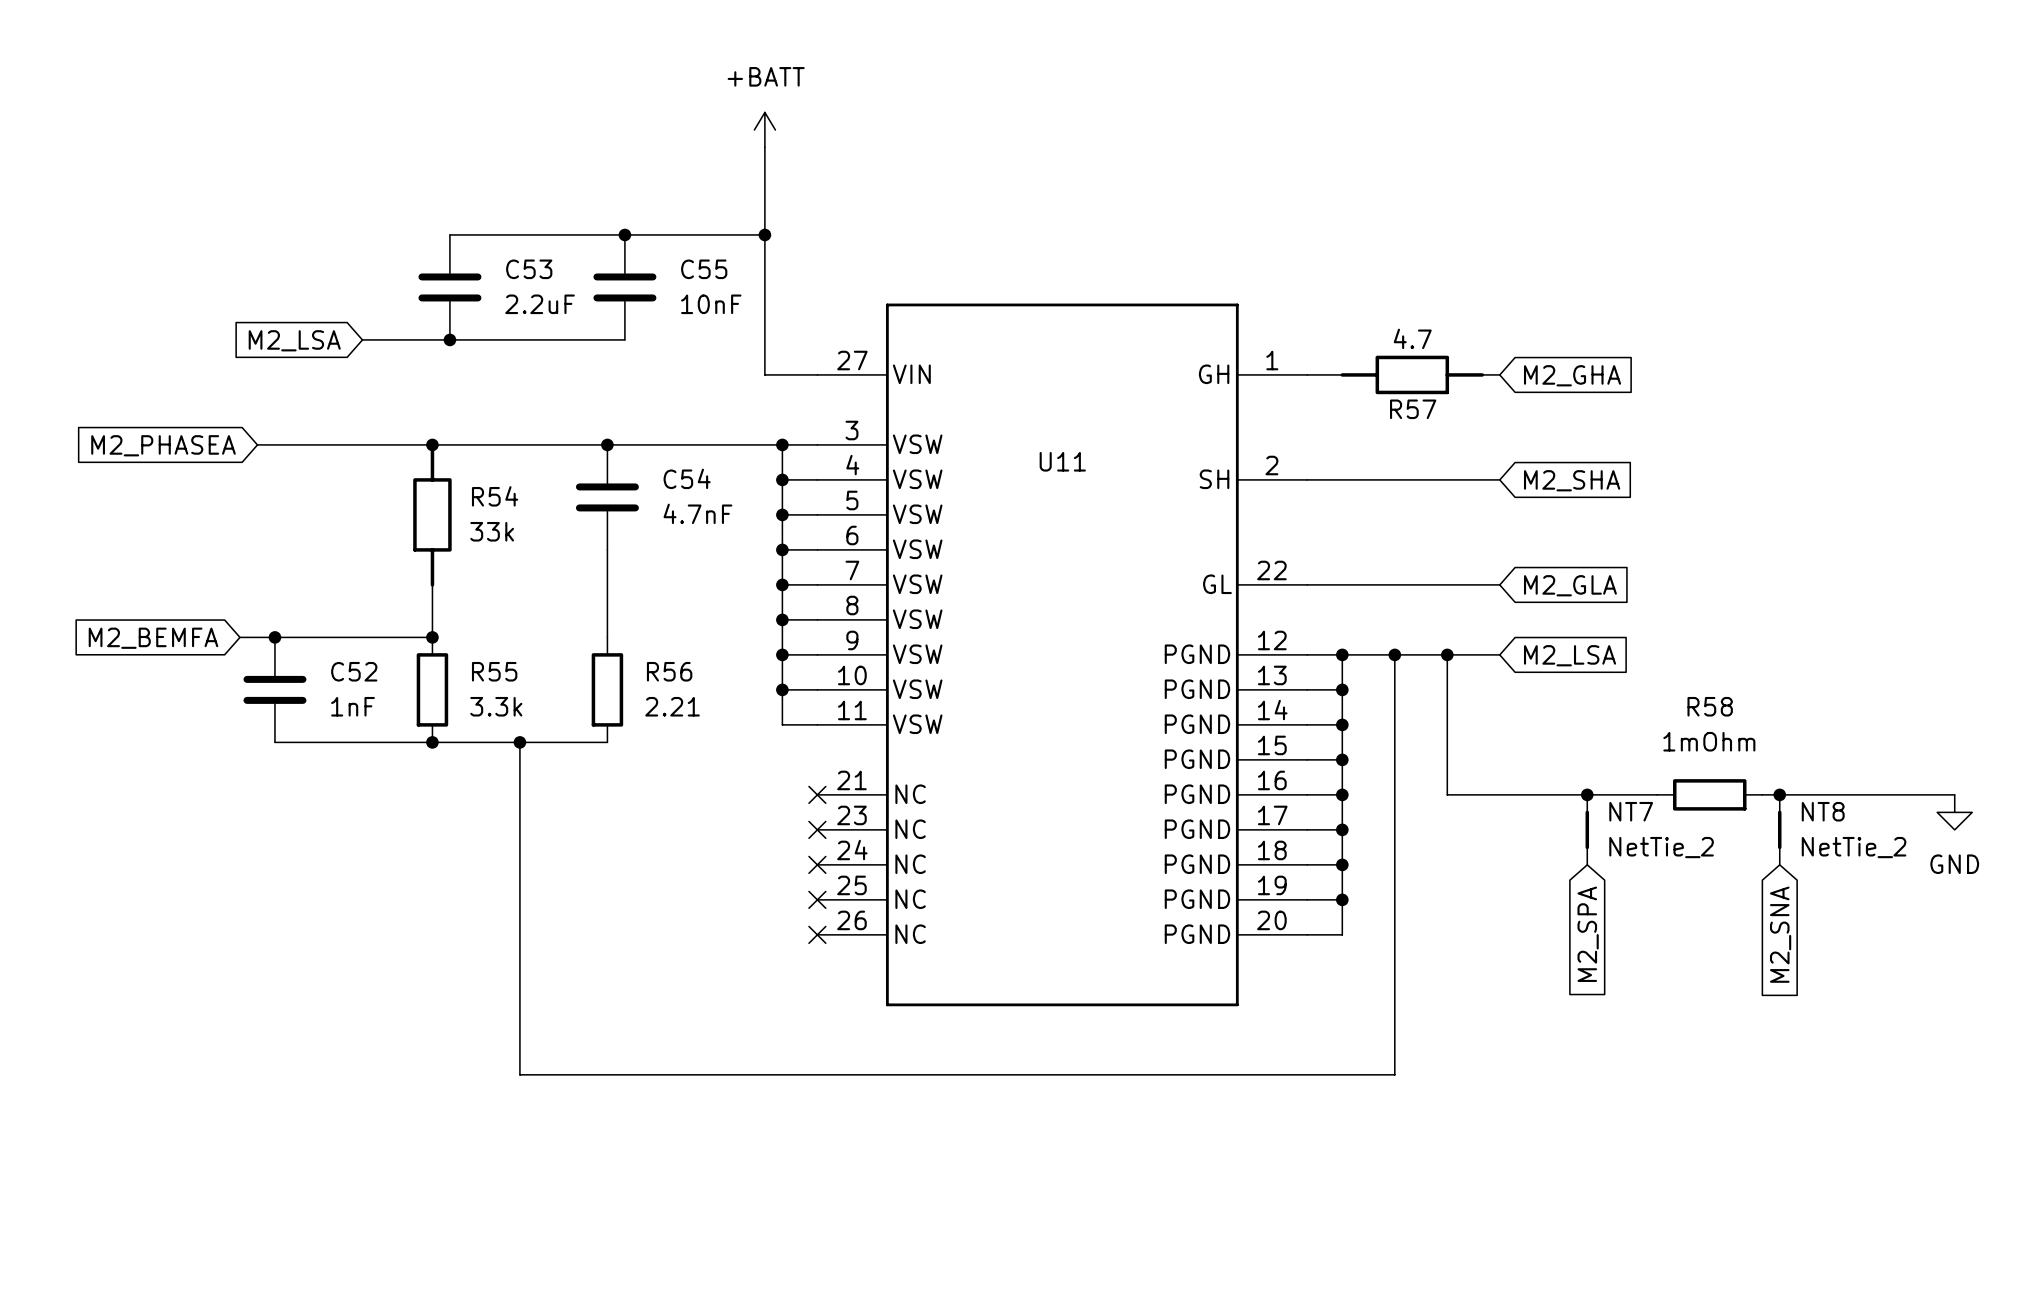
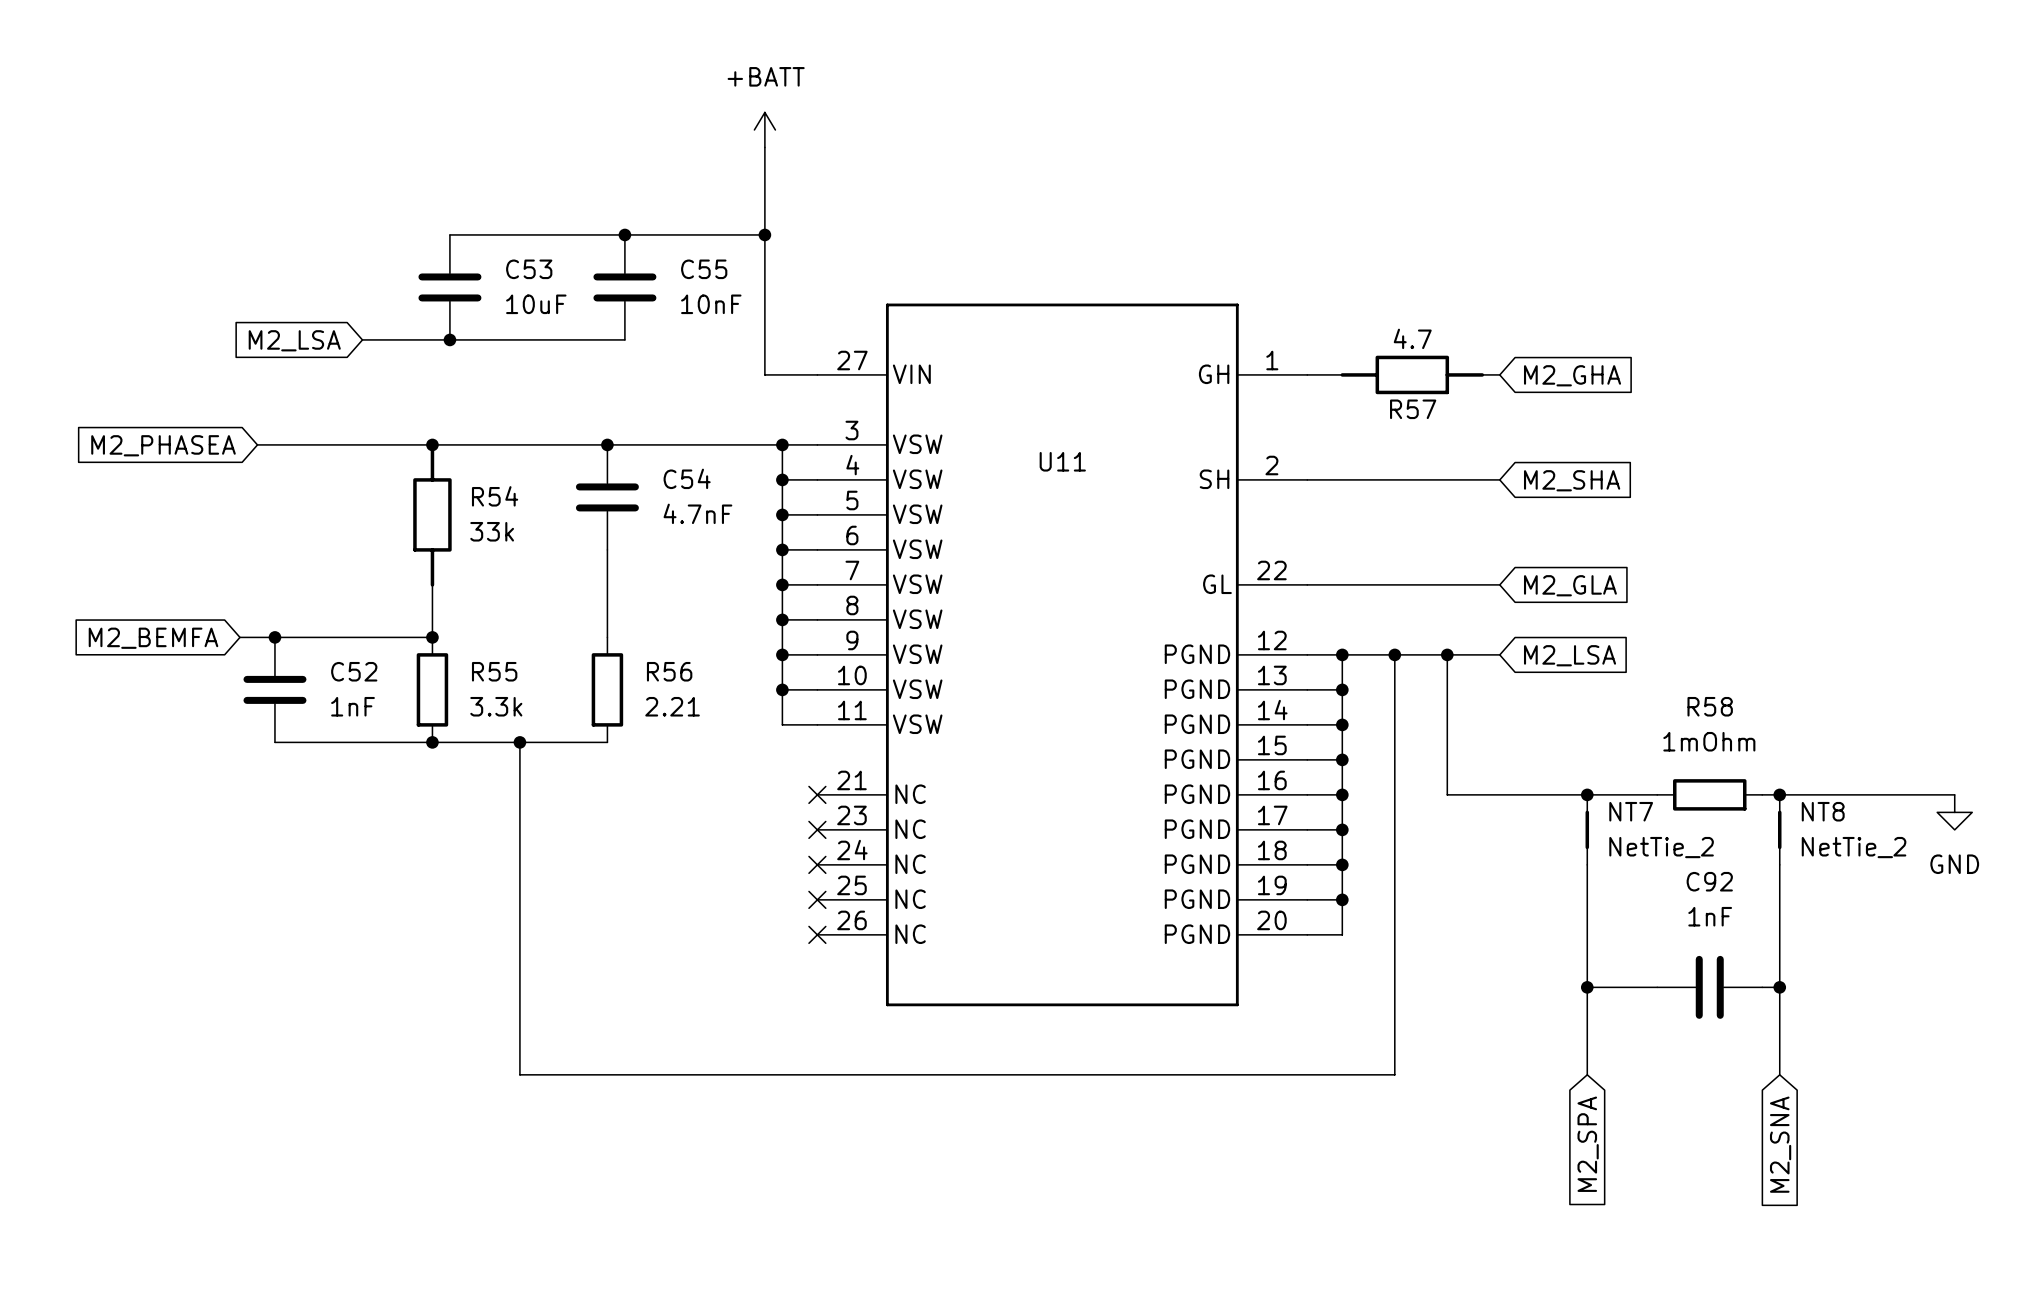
C53 value: 2.2uF (540, 304) -> 10uF (536, 304)
wire: none -> (1587, 864) (1587, 1074)
wire: none -> (1779, 864) (1779, 1074)
global label position: M2_SPA (1588, 934) -> M2_SPA (1588, 1144)
global label position: M2_SNA (1780, 934) -> M2_SNA (1780, 1144)
wire: none -> (1587, 987) (1657, 987)
junction: none -> (1587, 987)
C92: none -> 1nF (1709, 987)
wire: none -> (1762, 987) (1779, 987)
junction: none -> (1779, 987)

